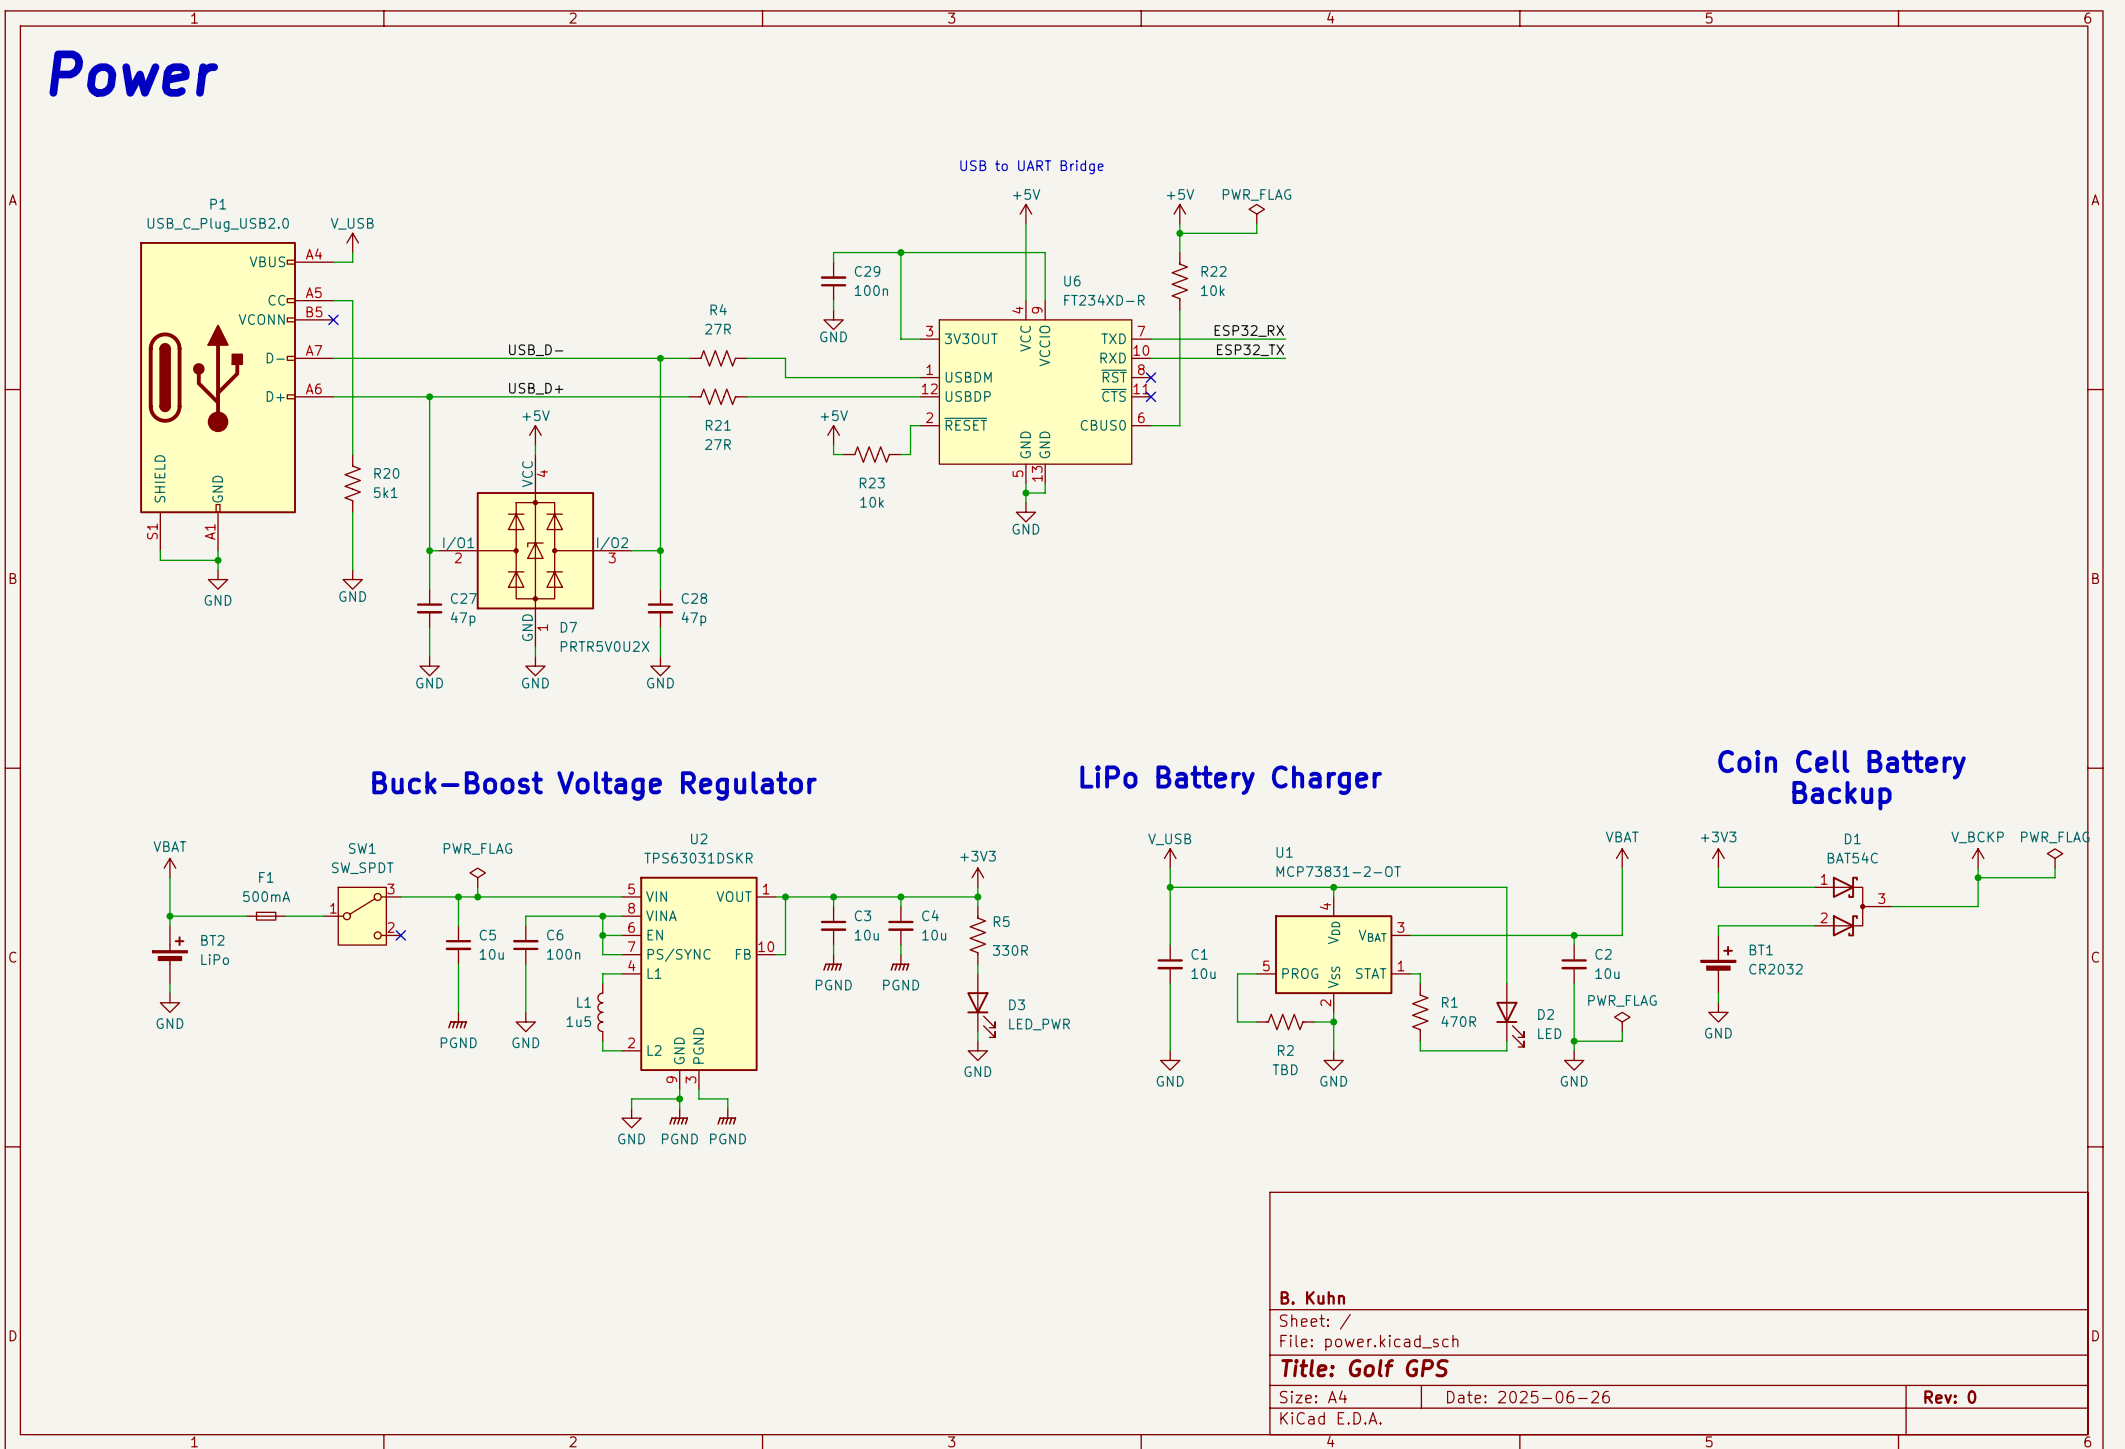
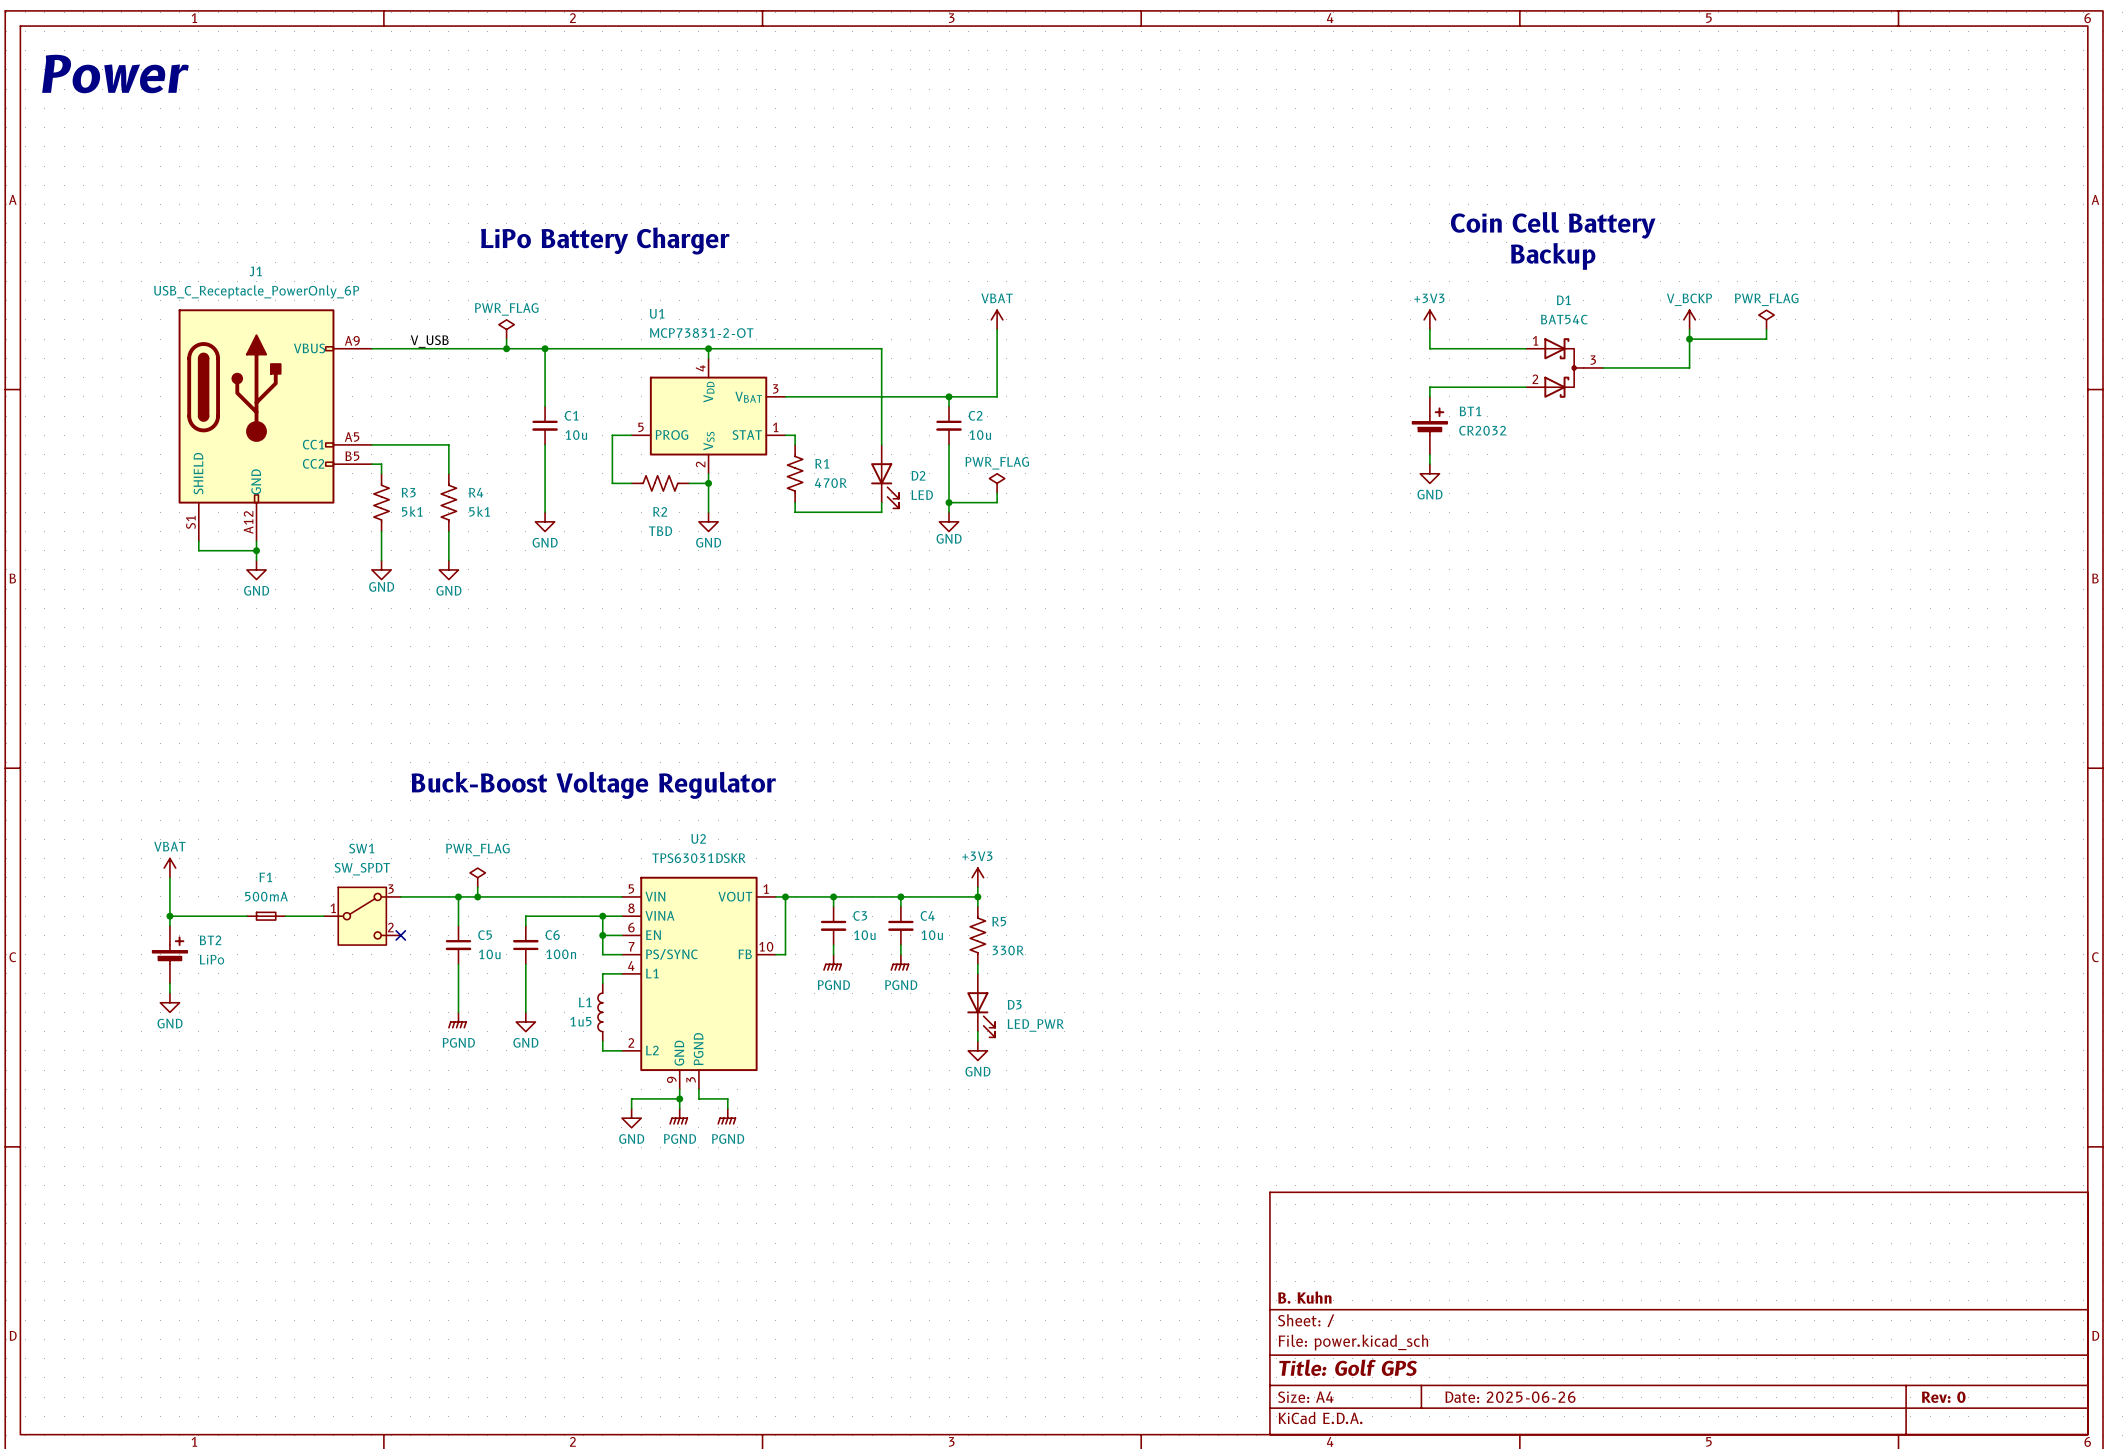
text: USB to UART Bridge (1031, 167) -> none
power symbol: +5V (1025, 214) -> none
power symbol: +5V (1179, 214) -> none
power symbol: PWR_FLAG (1256, 214) -> none
wire: (1025, 223) (1025, 300) -> none
wire: (1179, 223) (1179, 252) -> none
wire: (1256, 223) (1256, 233) (1179, 233) -> none
text: none -> Coin Cell Battery (1553, 225)
junction: (1179, 233) -> none
text: none -> LiPo Battery Charger (605, 241)
power symbol: V_USB (352, 242) -> none
wire: (352, 252) (352, 262) (333, 262) -> none
wire: (900, 252) (900, 339) (920, 339) -> none
junction: (900, 252) -> none
text: none -> Backup (1553, 256)
wire: (833, 262) (833, 252) (1045, 252) (1045, 300) -> none
C29: 100n (833, 281) -> none
R22: 10k (1179, 281) -> none
wire: (333, 300) (352, 300) (352, 454) -> none
wire: (833, 300) (833, 310) -> (708, 348) (708, 358)
R4 name position: R4 (718, 309) -> R4 (476, 492)
wire: (1179, 310) (1179, 425) (1150, 425) -> none
no-connect mark: (333, 319) -> none
power symbol: GND (833, 319) -> none
power symbol: none -> VBAT (997, 319)
power symbol: none -> +3V3 (1429, 319)
power symbol: none -> V_BCKP (1689, 319)
power symbol: none -> PWR_FLAG (1766, 319)
power symbol: none -> PWR_FLAG (506, 329)
R4 value: 27R (717, 329) -> 5k1 (479, 511)
wire: none -> (1429, 329) (1429, 348) (1526, 348)
wire: none -> (1689, 329) (1689, 367) (1603, 367)
wire: none -> (1766, 329) (1766, 339) (1689, 339)
label: ESP32_RX (1249, 331) -> none
wire: (1150, 339) (1285, 339) -> none
junction: none -> (1689, 339)
label: none -> V_USB (429, 341)
wire: none -> (371, 348) (881, 348) (881, 444)
junction: none -> (506, 348)
wire: none -> (545, 348) (545, 406)
junction: none -> (545, 348)
junction: none -> (708, 348)
label: USB_D- (536, 350) -> none
label: ESP32_TX (1250, 350) -> none
wire: (333, 358) (689, 358) -> none
wire: (660, 358) (660, 589) -> none
junction: (660, 358) -> none
R4 rotation: 0° (718, 358) -> 90° clockwise (448, 502)
R4 position: (718, 358) -> (448, 502)
wire: (747, 358) (785, 358) (785, 377) (920, 377) -> none
wire: (1150, 358) (1285, 358) -> none
no-connect mark: (1150, 377) -> none
wire: none -> (1526, 387) (1429, 387) (1429, 396)
label: USB_D+ (536, 388) -> none
U6: FT234XD-R (1035, 392) -> none
P1: USB_C_Plug_USB2.0 (236, 396) -> none
wire: (333, 396) (689, 396) -> none
wire: (429, 396) (429, 589) -> none
junction: (429, 396) -> none
R21: 27R (718, 396) -> none
junction: none -> (949, 396)
no-connect mark: (1150, 396) -> none
J1: none -> USB_C_Receptacle_PowerOnly_6P (275, 425)
wire: (920, 425) (910, 425) (910, 454) (900, 454) -> none
power symbol: +5V (535, 435) -> none
wire: none -> (631, 435) (612, 435) (612, 483) (631, 483)
wire: none -> (785, 435) (795, 435) (795, 444)
power symbol: +5V (833, 435) -> none
wire: none -> (371, 444) (448, 444) (448, 473)
wire: (535, 444) (535, 454) -> (506, 339) (506, 348)
wire: none -> (545, 444) (545, 512)
wire: (833, 444) (833, 454) (843, 454) -> none
wire: none -> (949, 444) (949, 512)
R23: 10k (872, 454) -> none
wire: none -> (1429, 454) (1429, 464)
wire: none -> (371, 464) (381, 464) (381, 473)
wire: none -> (708, 473) (708, 512)
power symbol: none -> GND (1429, 473)
R20: 5k1 (352, 483) -> none
wire: none -> (689, 483) (708, 483)
junction: none -> (708, 483)
power symbol: none -> PWR_FLAG (997, 483)
wire: (1025, 483) (1025, 502) -> none
wire: (1045, 483) (1045, 493) (1025, 493) -> none
wire: none -> (997, 493) (997, 502) (949, 502)
junction: (1025, 493) -> none
R3: none -> 5k1 (381, 502)
wire: none -> (795, 502) (795, 512) (881, 512) (881, 502)
junction: none -> (949, 502)
wire: (352, 512) (352, 569) -> none
power symbol position: GND (1025, 512) -> GND (949, 521)
power symbol: none -> GND (545, 521)
power symbol: none -> GND (708, 521)
wire: none -> (381, 531) (381, 560)
wire: (160, 550) (160, 560) (218, 560) -> (198, 541) (198, 550) (256, 550)
wire: (218, 550) (218, 569) -> (256, 541) (256, 560)
wire: (429, 550) (439, 550) -> none
junction: (429, 550) -> none
D7: PRTR5V0U2X (535, 550) -> none
wire: (631, 550) (660, 550) -> none
junction: (660, 550) -> none
junction position: (218, 560) -> (256, 550)
power symbol: none -> GND (448, 569)
power symbol position: GND (218, 579) -> GND (256, 569)
power symbol position: GND (352, 579) -> GND (381, 569)
C27: 47p (429, 608) -> none
C28: 47p (660, 608) -> none
wire: (429, 627) (429, 656) -> (448, 531) (448, 560)
wire: (660, 627) (660, 656) -> none
wire: (535, 646) (535, 656) -> none
power symbol: GND (429, 666) -> none
power symbol: GND (535, 666) -> none
power symbol: GND (660, 666) -> none
text: Coin Cell Battery (1841, 764) -> none
text: LiPo Battery Charger (1231, 780) -> none
text: Backup (1841, 795) -> none
power symbol: V_USB (1170, 858) -> none
power symbol: VBAT (1622, 858) -> none
power symbol: +3V3 (1718, 858) -> none
power symbol: V_BCKP (1978, 858) -> none
power symbol: PWR_FLAG (2055, 858) -> none
wire: (1170, 868) (1170, 945) -> none
wire: (1622, 868) (1622, 935) (1410, 935) -> none
wire: (1718, 868) (1718, 887) (1814, 887) -> none
wire: (1978, 868) (1978, 906) (1891, 906) -> none
wire: (2055, 868) (2055, 877) (1978, 877) -> none
junction: (1978, 877) -> none
wire: (1170, 887) (1506, 887) (1506, 983) -> none
junction: (1170, 887) -> none
wire: (1333, 887) (1333, 896) -> none
junction: (1333, 887) -> none
D1 position: (1853, 906) -> (1564, 367)
wire: (1814, 925) (1718, 925) (1718, 935) -> none
wire: (1574, 935) (1574, 945) -> none
junction: (1574, 935) -> none
U1 position: (1333, 954) -> (708, 416)
C1 position: (1170, 964) -> (545, 425)
C2 position: (1574, 964) -> (949, 425)
BT1 position: (1718, 964) -> (1429, 425)
wire: (1256, 973) (1237, 973) (1237, 1021) (1256, 1021) -> none
wire: (1410, 973) (1420, 973) (1420, 983) -> none
wire: (1170, 983) (1170, 1050) -> none
wire: (1574, 983) (1574, 1050) -> none
wire: (1718, 993) (1718, 1002) -> none
wire: (1333, 1012) (1333, 1050) -> none
R1 position: (1420, 1012) -> (795, 473)
power symbol: GND (1718, 1012) -> none
D2 position: (1510, 1015) -> (885, 476)
R2 position: (1285, 1021) -> (660, 483)
wire: (1314, 1021) (1333, 1021) -> none
junction: (1333, 1021) -> none
power symbol: PWR_FLAG (1622, 1021) -> none
wire: (1622, 1031) (1622, 1041) (1574, 1041) -> none
wire: (1420, 1041) (1420, 1050) (1506, 1050) (1506, 1041) -> none
junction: (1574, 1041) -> none
power symbol: GND (1170, 1060) -> none
power symbol: GND (1333, 1060) -> none
power symbol: GND (1574, 1060) -> none

